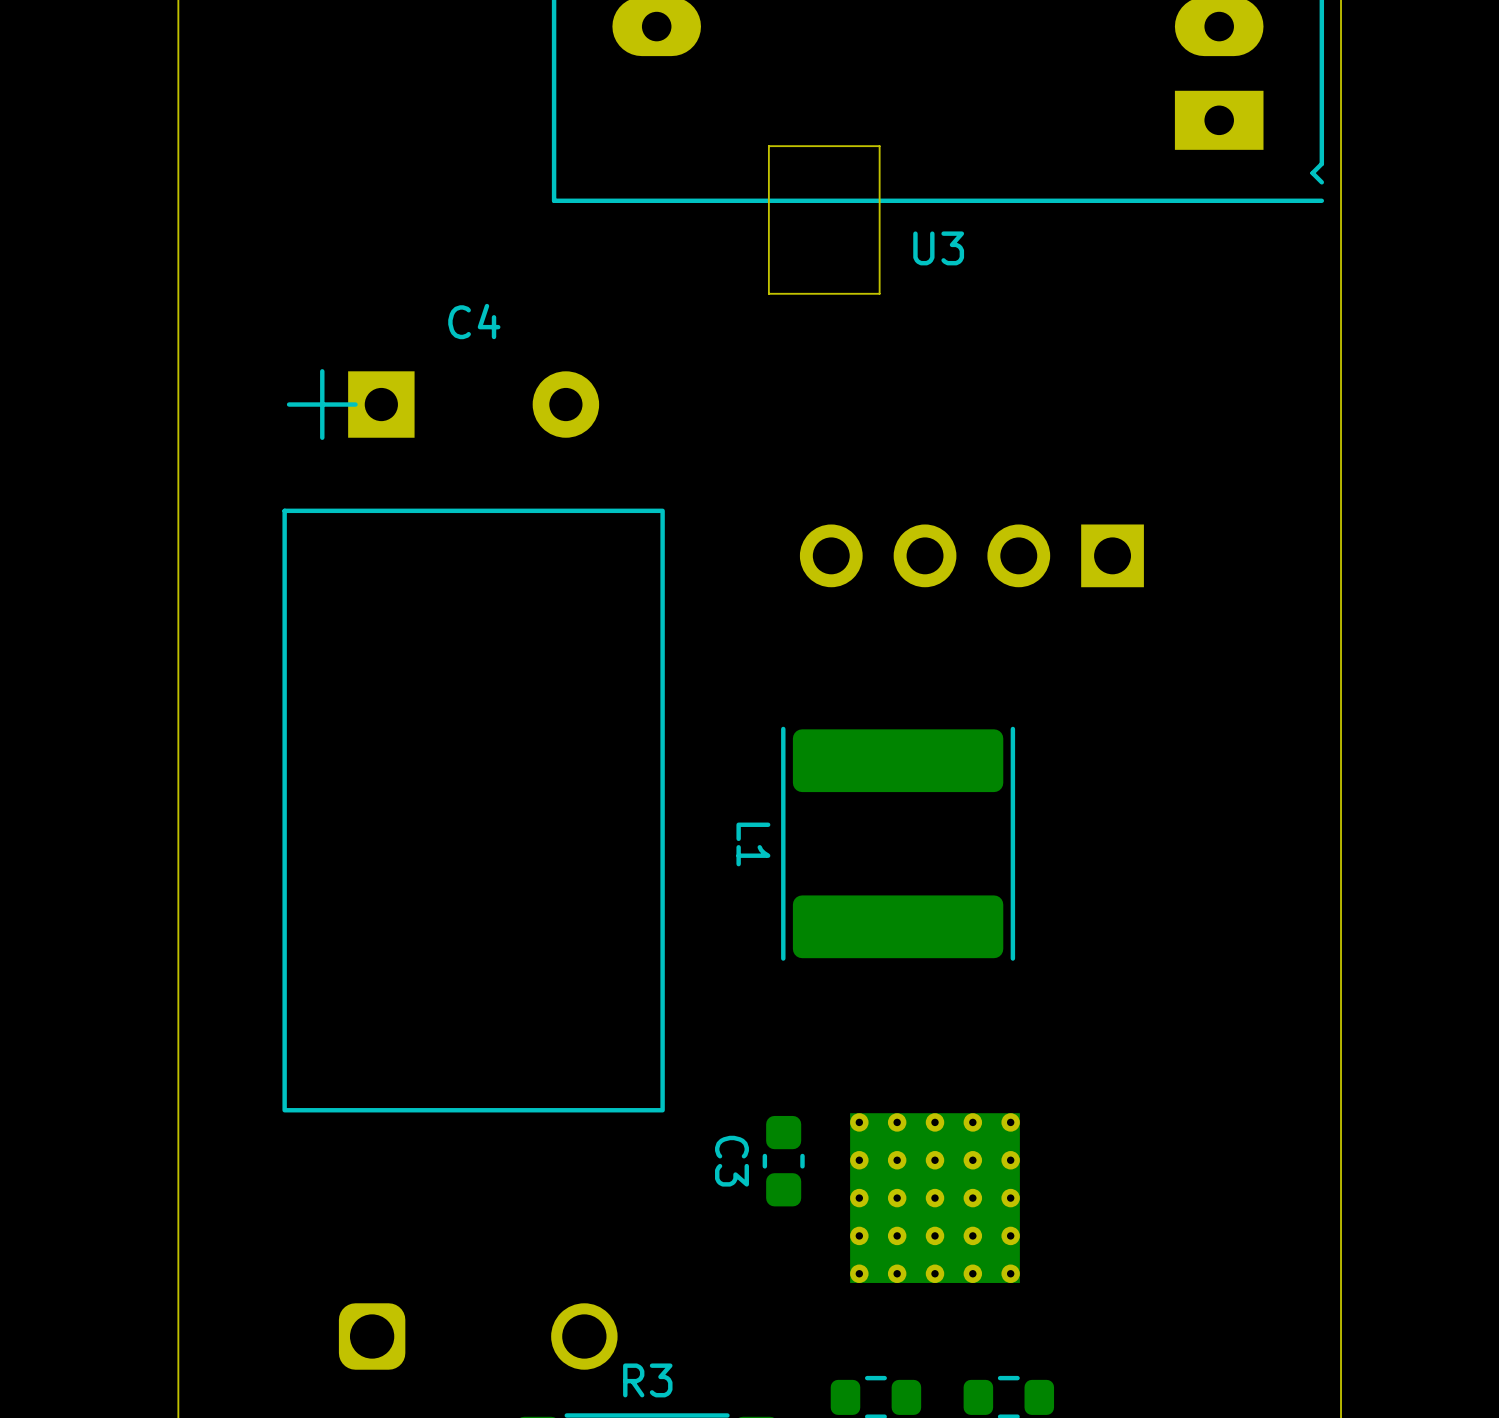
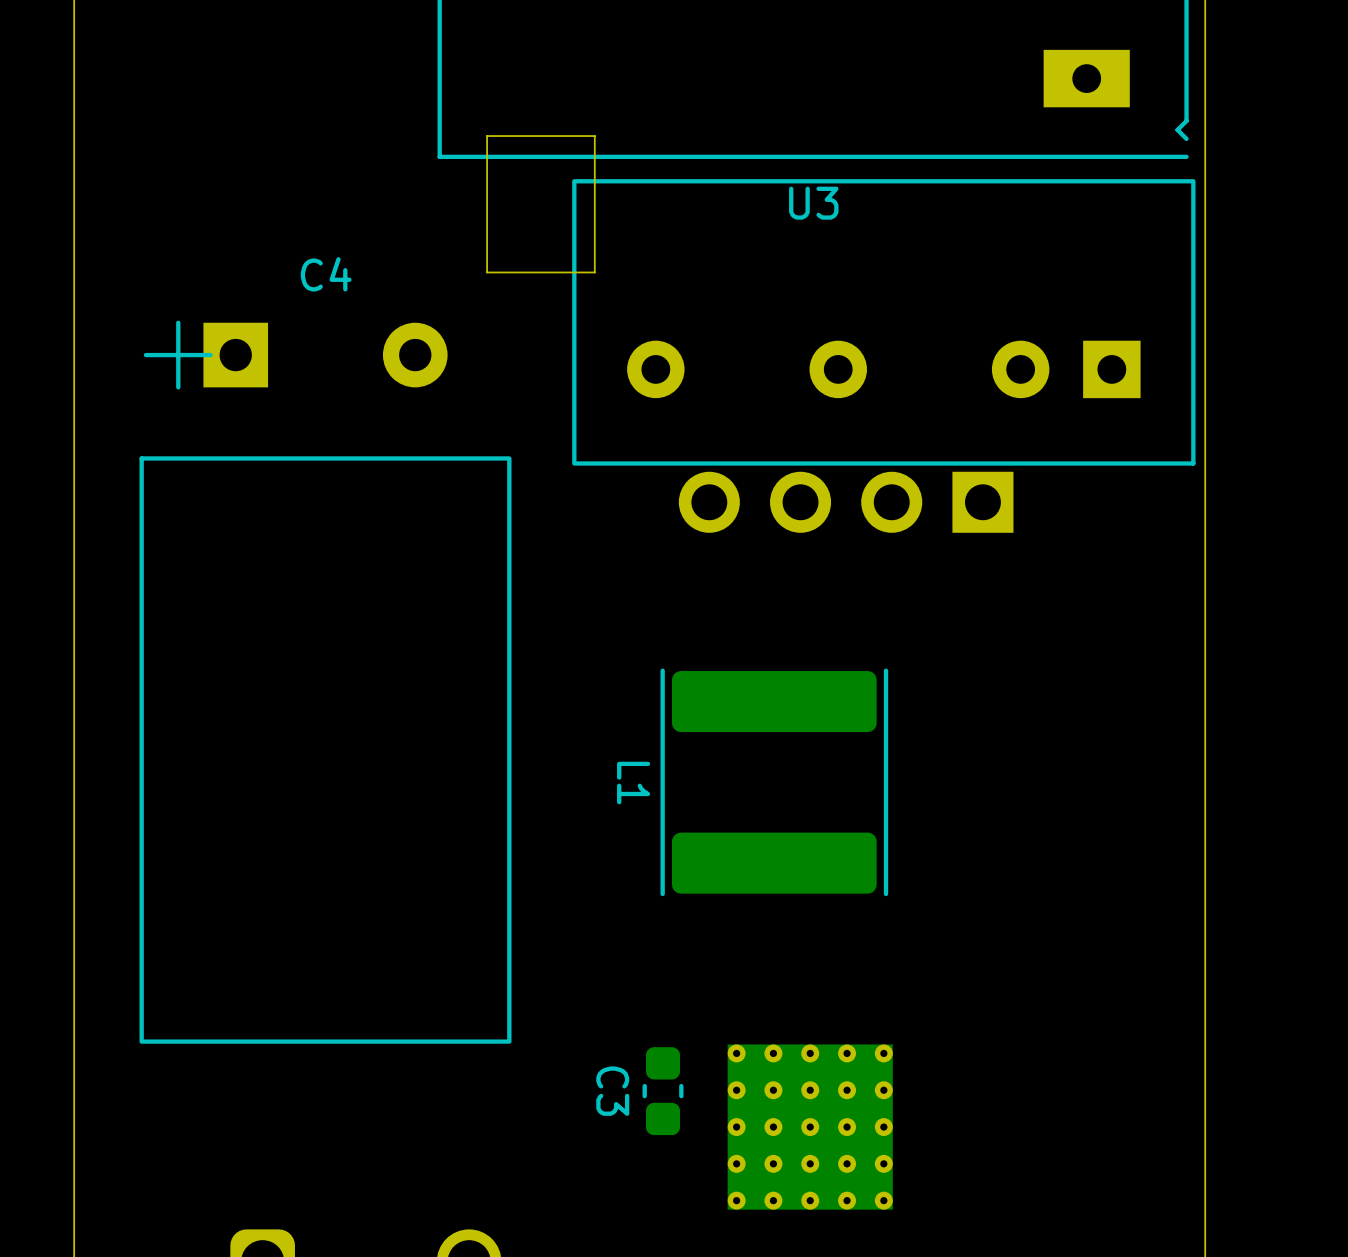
board edge: (879, 146) (879, 293) (768, 293) (768, 146) (879, 146) -> none
board edge: none -> (594, 136) (594, 272) (487, 272) (487, 136) (594, 136)
part: none -> (883, 322)
C4 position: (473, 740) -> (325, 682)

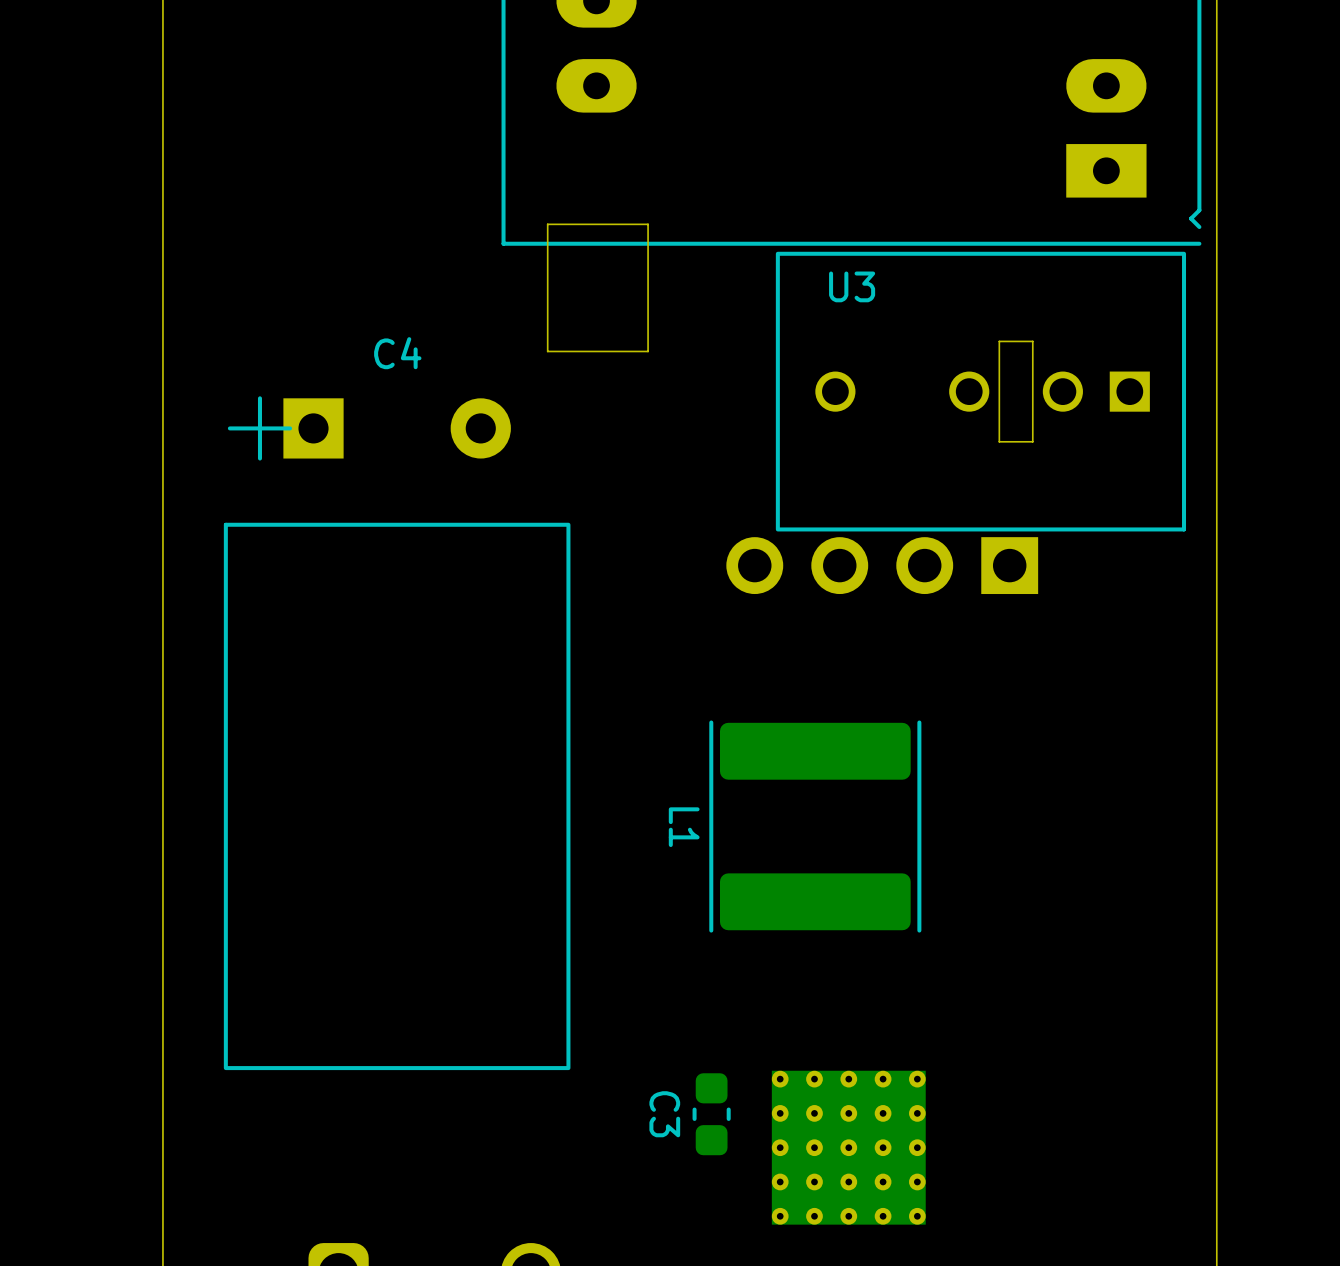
board edge: none -> (1032, 341) (1032, 441) (999, 441) (999, 341) (1032, 341)
part: none -> (980, 391)
part: (883, 322) -> none

